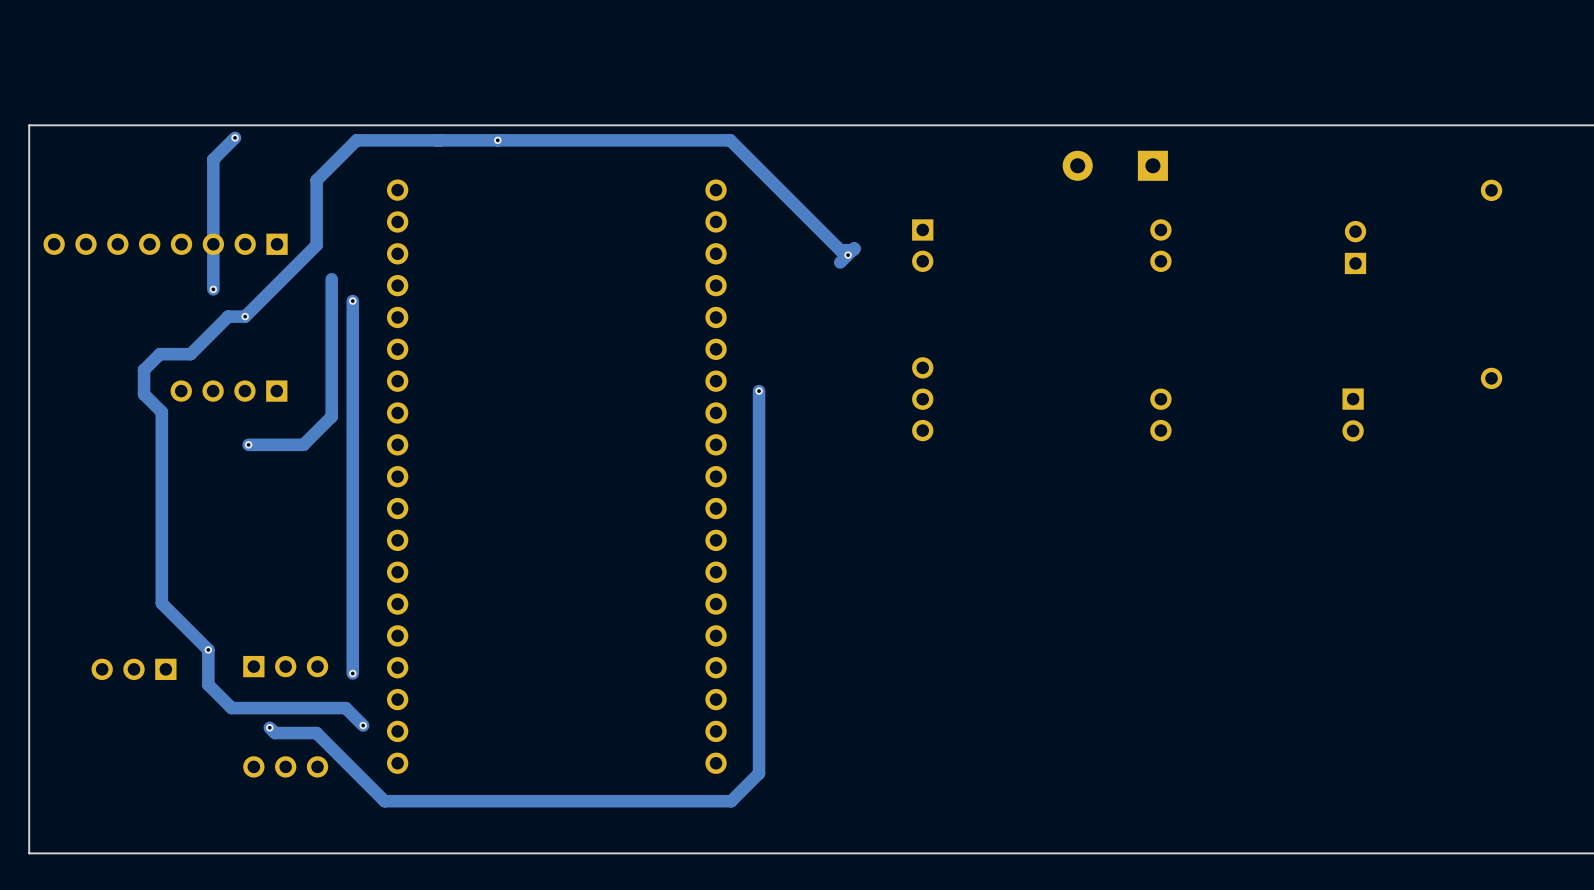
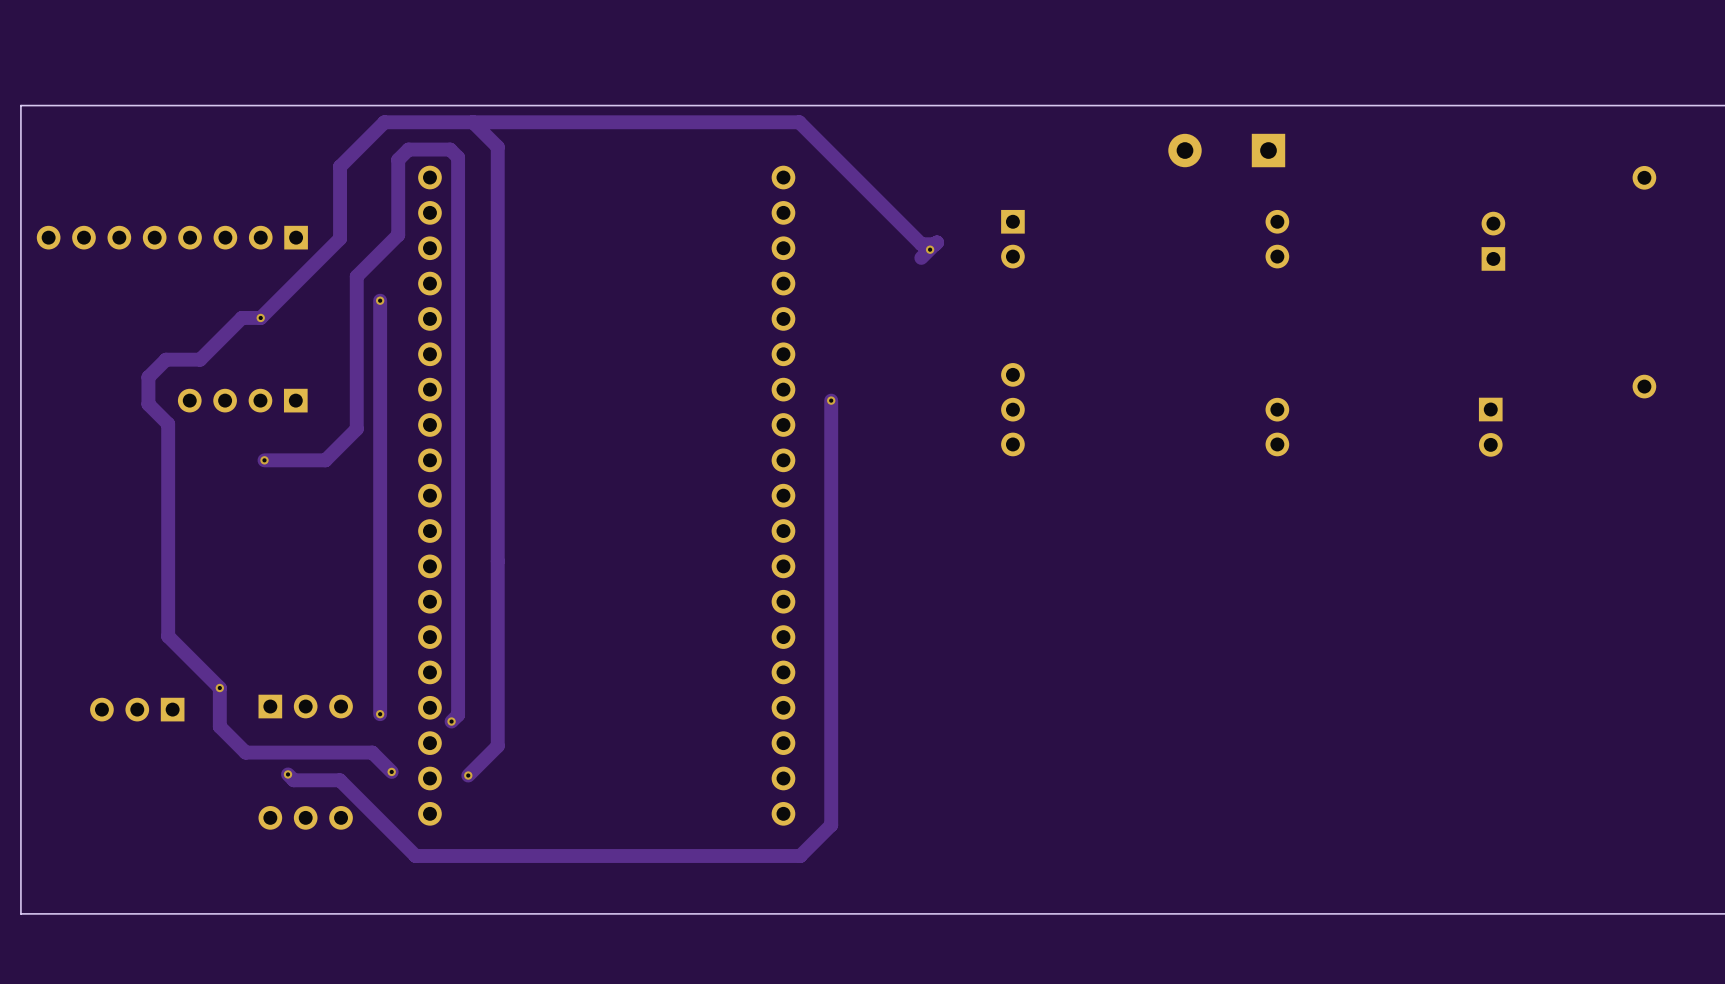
track: (235, 137) (213, 159) (213, 289) -> none
via: (235, 137) -> none
track: none -> (472, 122) (497, 147) (497, 746) (468, 775)
via: (497, 140) -> none
track: none -> (356, 276) (398, 235) (398, 159) (408, 149) (450, 149) (458, 157) (458, 715) (451, 721)
via: (213, 289) -> none
via: none -> (451, 721)
via: none -> (468, 775)

